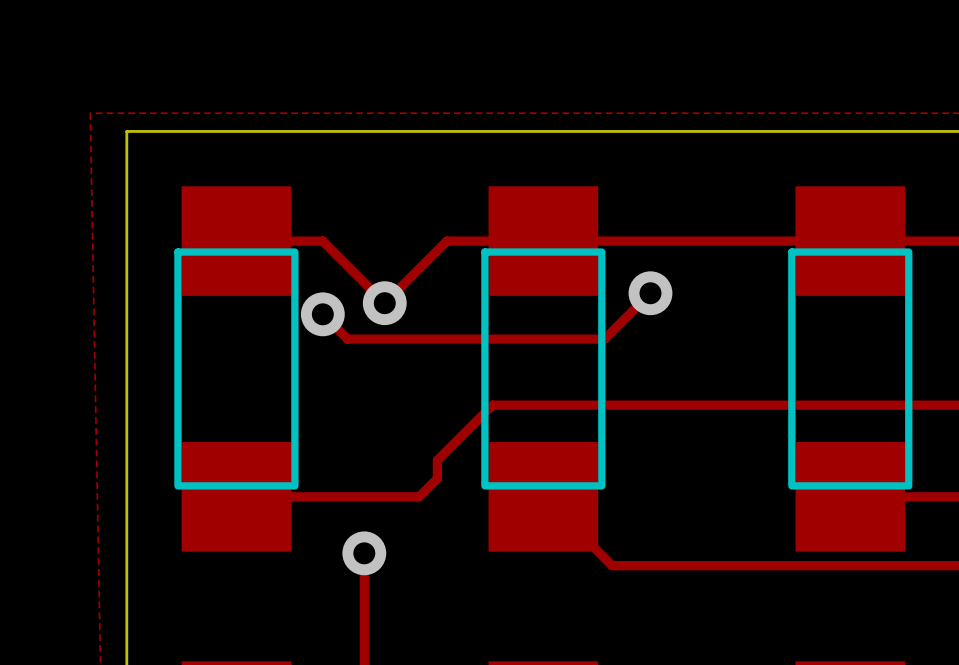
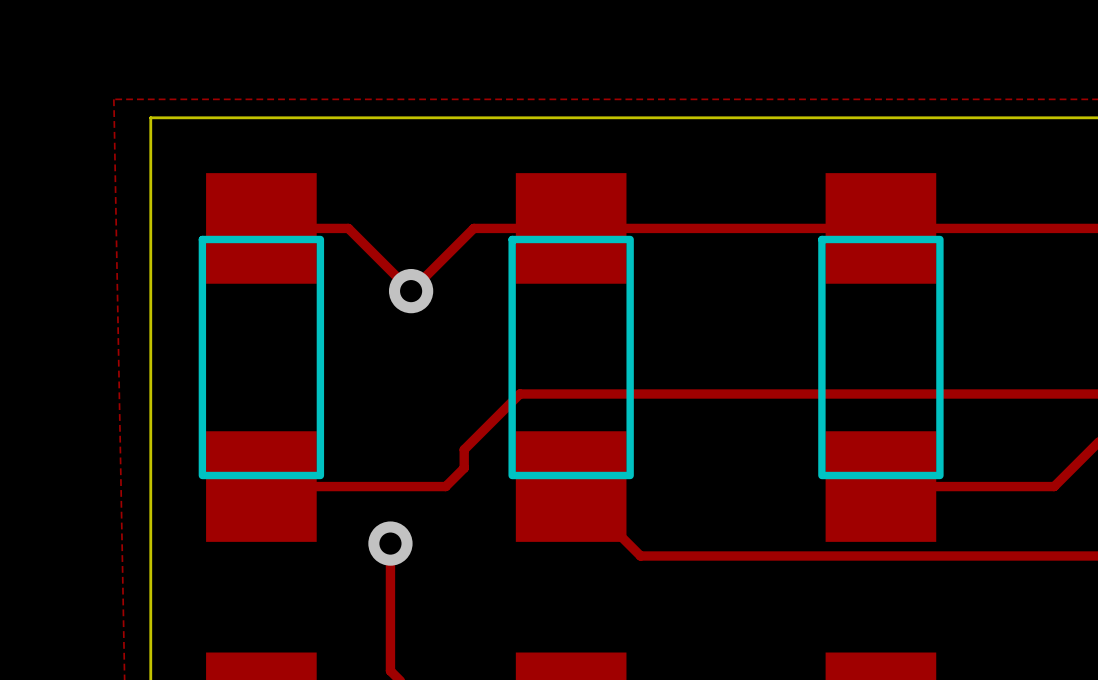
track: (650, 293) (604, 339) (347, 339) (322, 314) -> none
via: (650, 293) -> none
via: (322, 314) -> none

